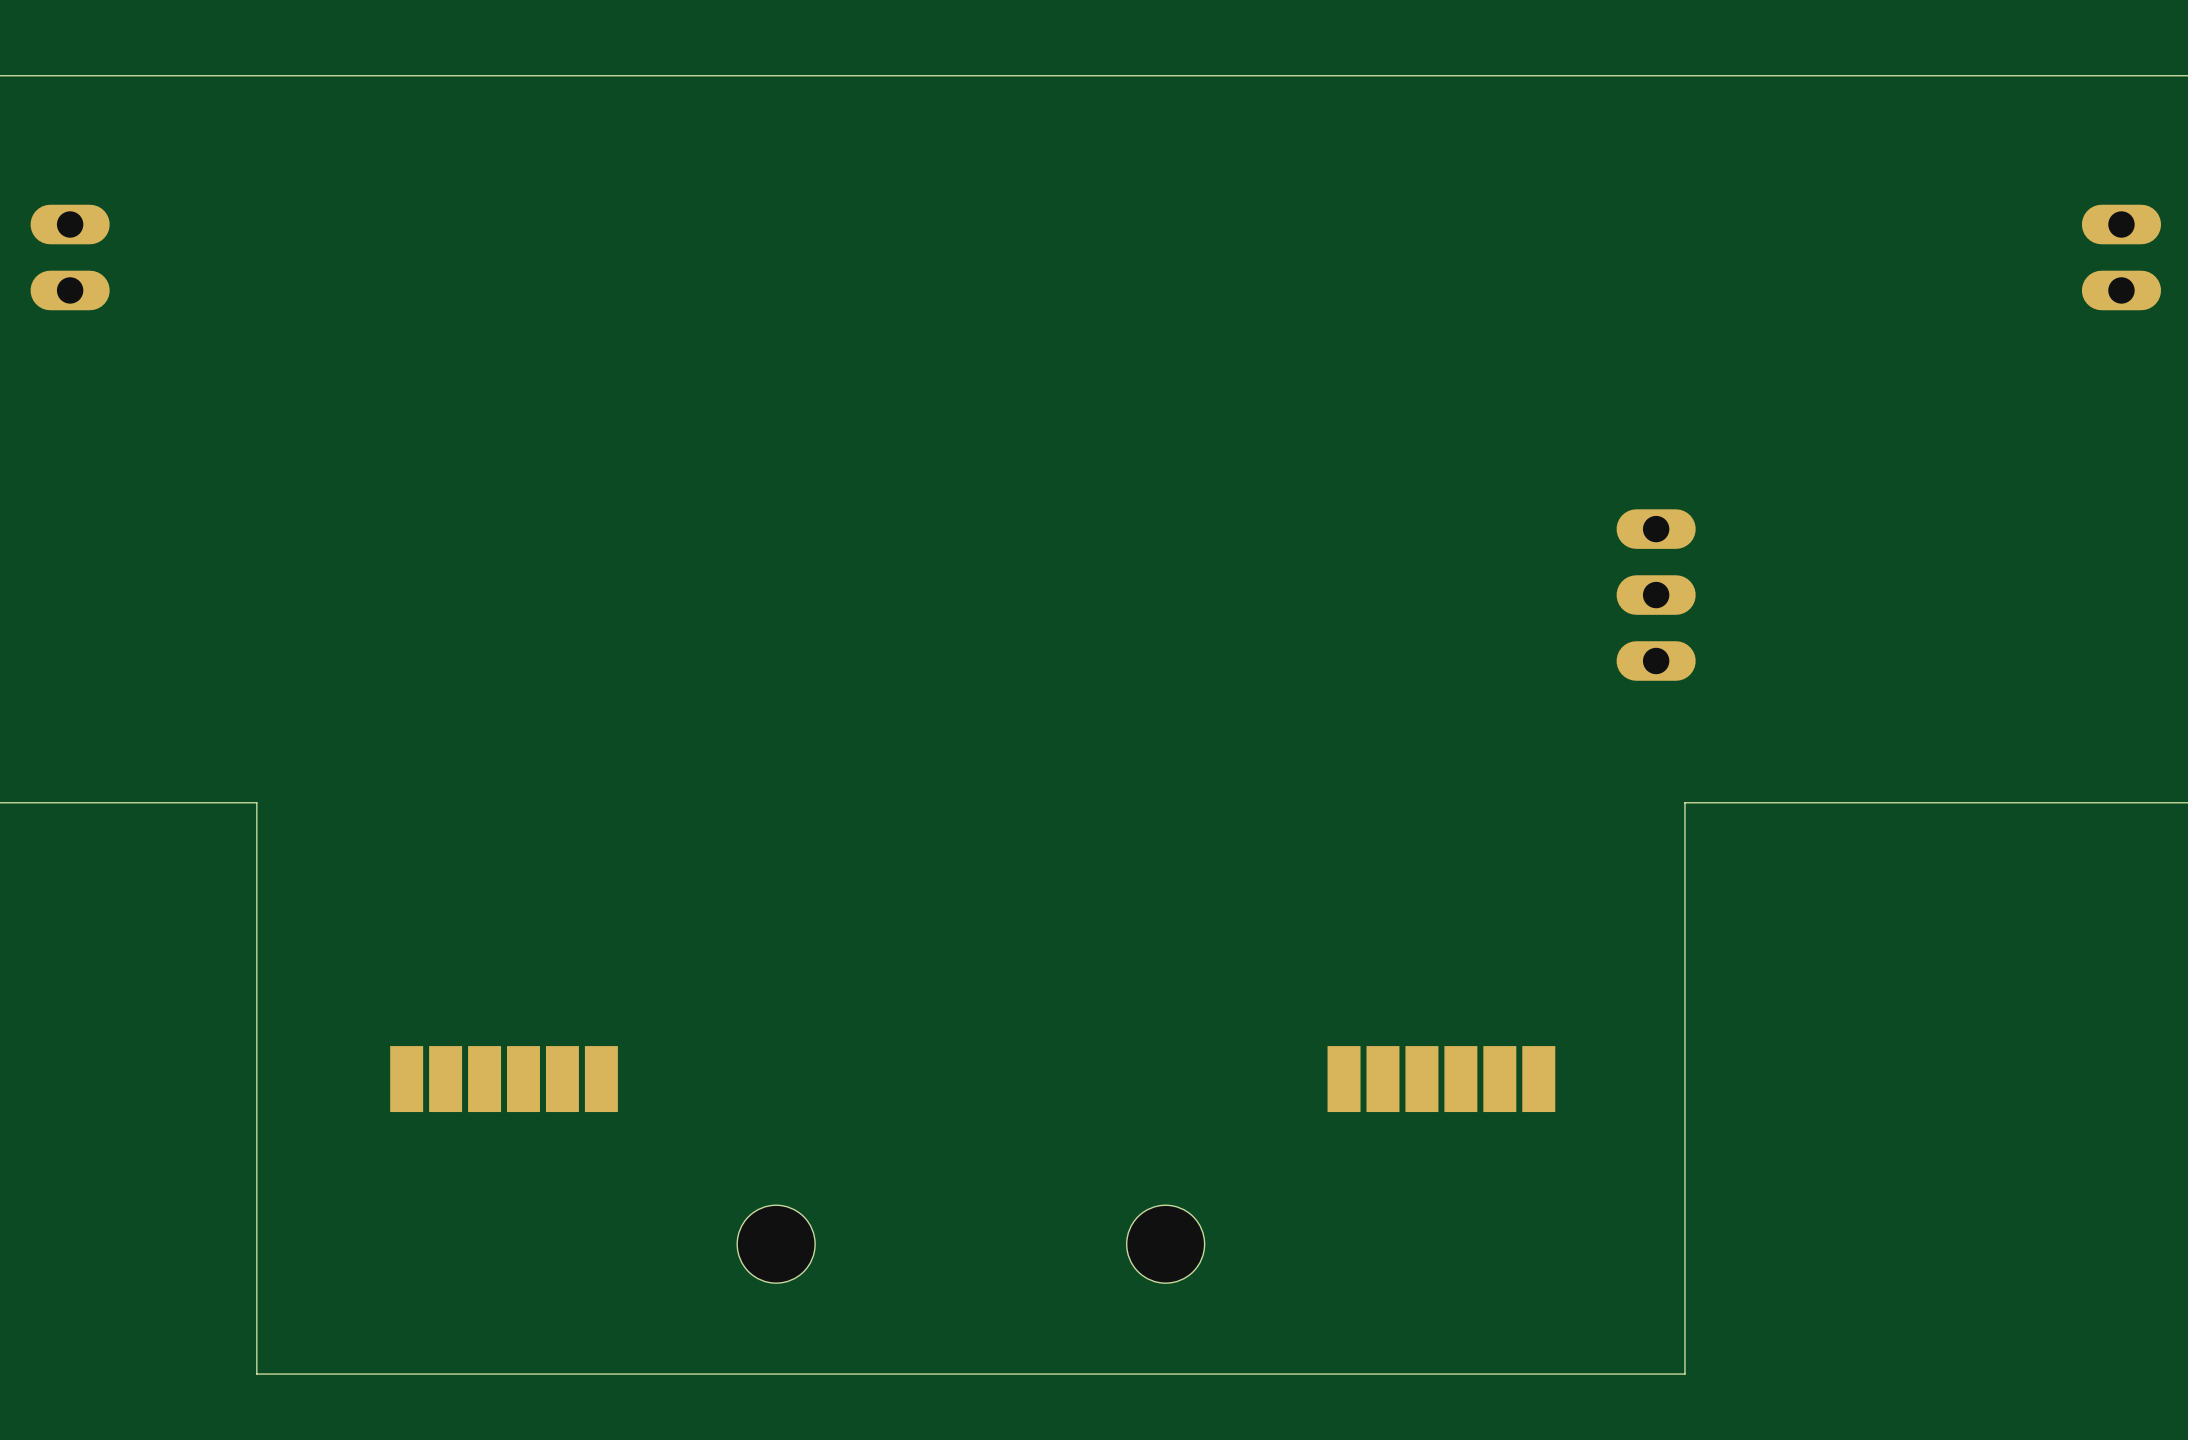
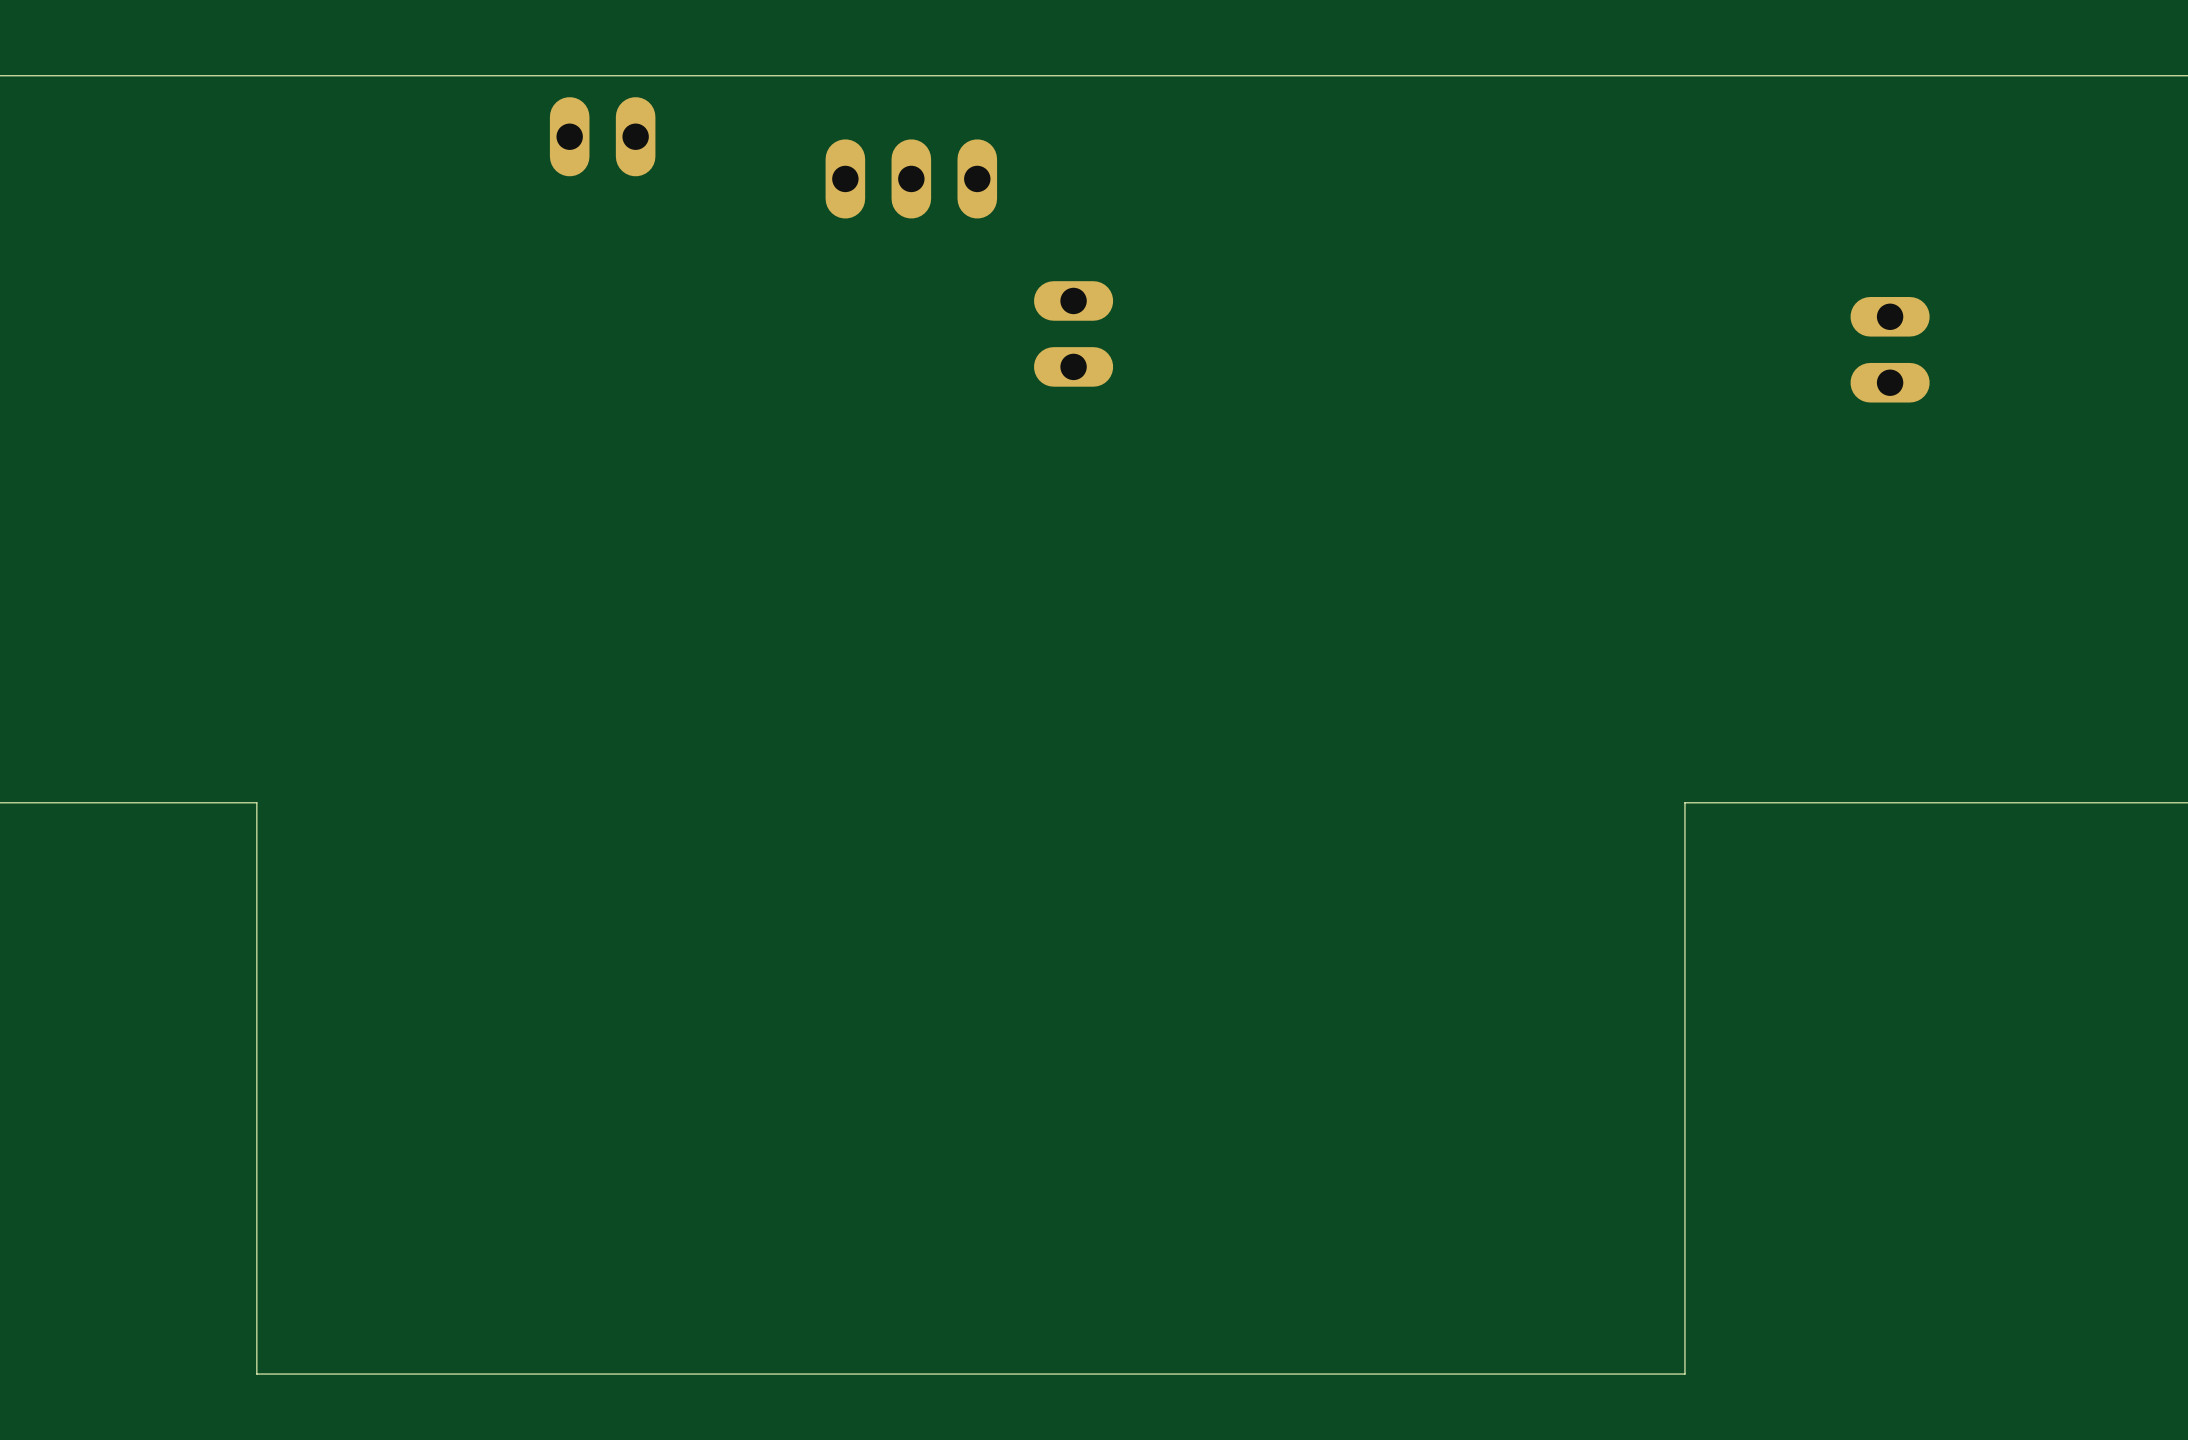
part: none -> (602, 136)
part: none -> (911, 178)
part: (70, 257) -> none
part position: (2121, 257) -> (1890, 349)
part: none -> (1073, 333)
part: (1656, 595) -> none
part: (504, 1079) -> none
part: (1441, 1079) -> none
hole: (776, 1244) -> none
hole: (1165, 1244) -> none

